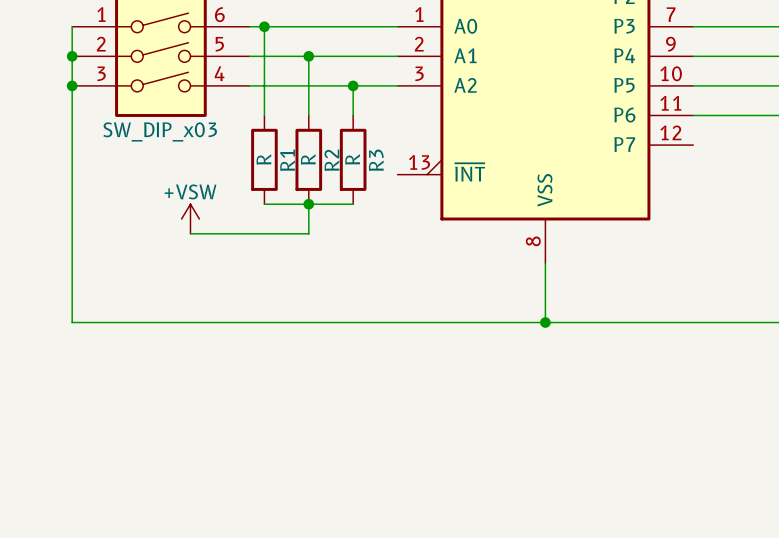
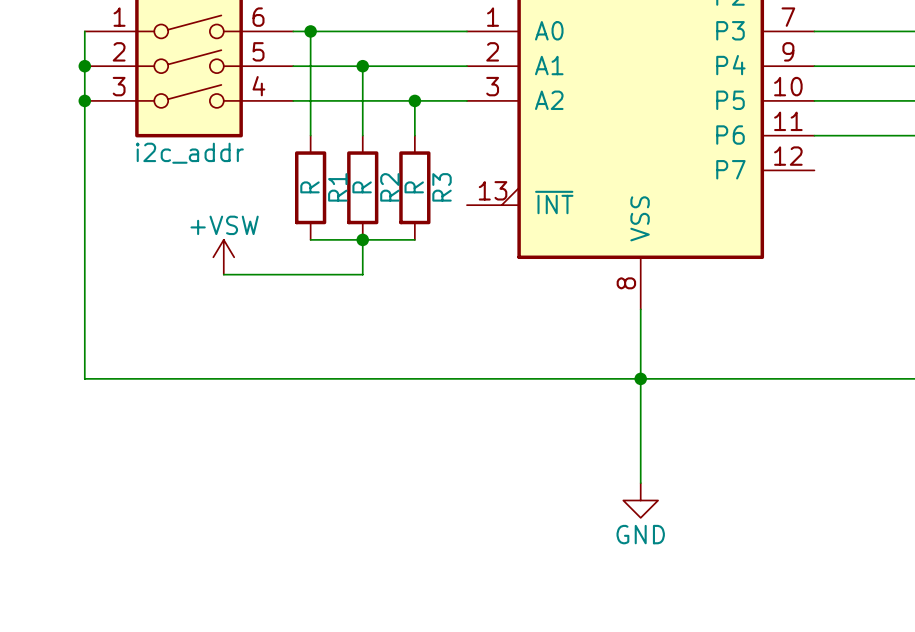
part value: SW_DIP_x03 (160, 131) -> i2c_addr (189, 153)
wire: none -> (640, 378) (640, 483)
power symbol: none -> GND (640, 500)

